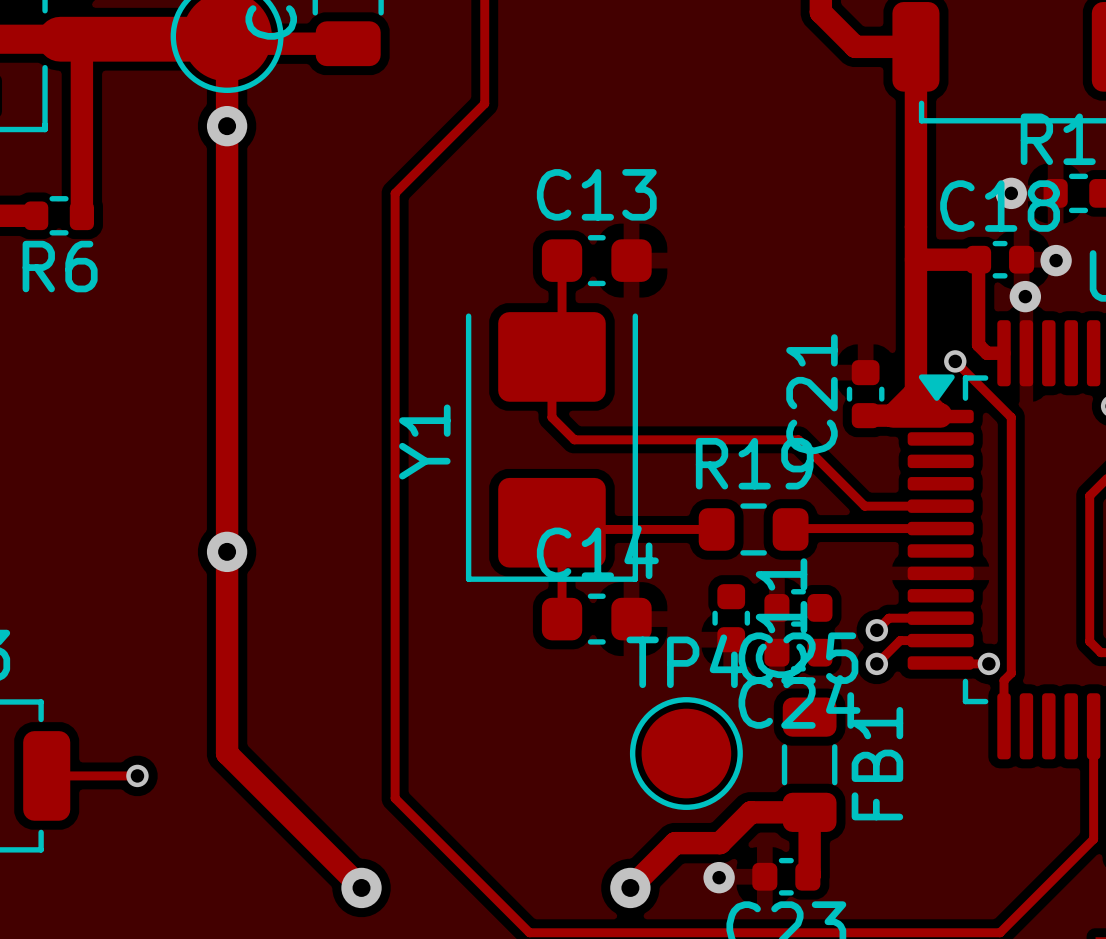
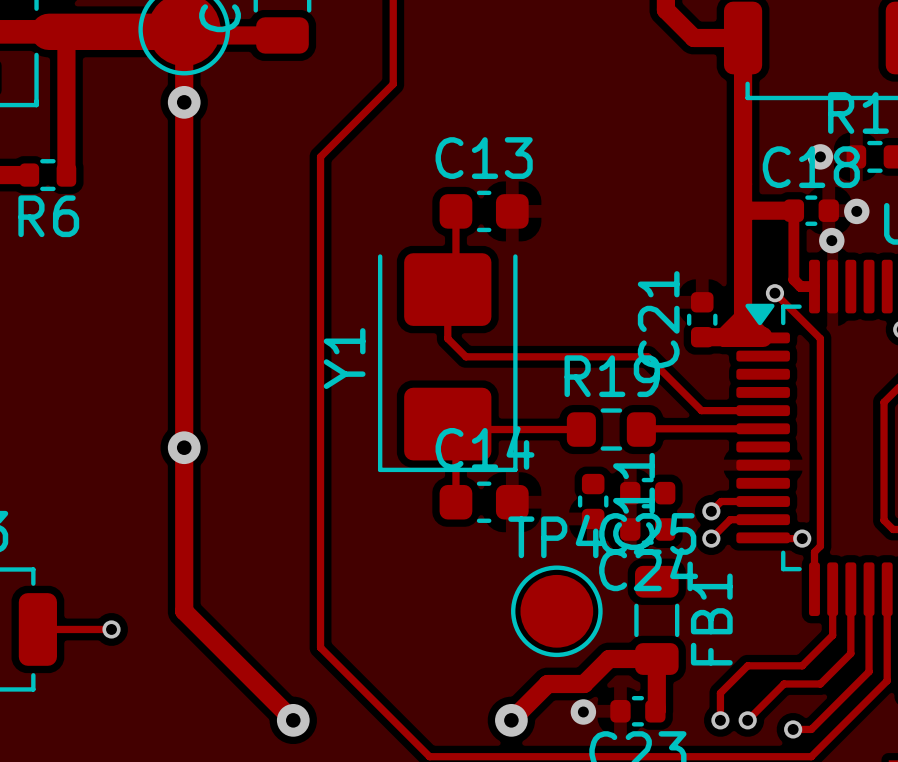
track: none -> (832, 589) (832, 635) (802, 665) (747, 665) (720, 693) (720, 720)
track: none -> (850, 589) (850, 653) (820, 684) (784, 684) (747, 720)
track: none -> (869, 589) (869, 671) (811, 729) (793, 729)
via: none -> (720, 720)
via: none -> (747, 720)
via: none -> (793, 729)

